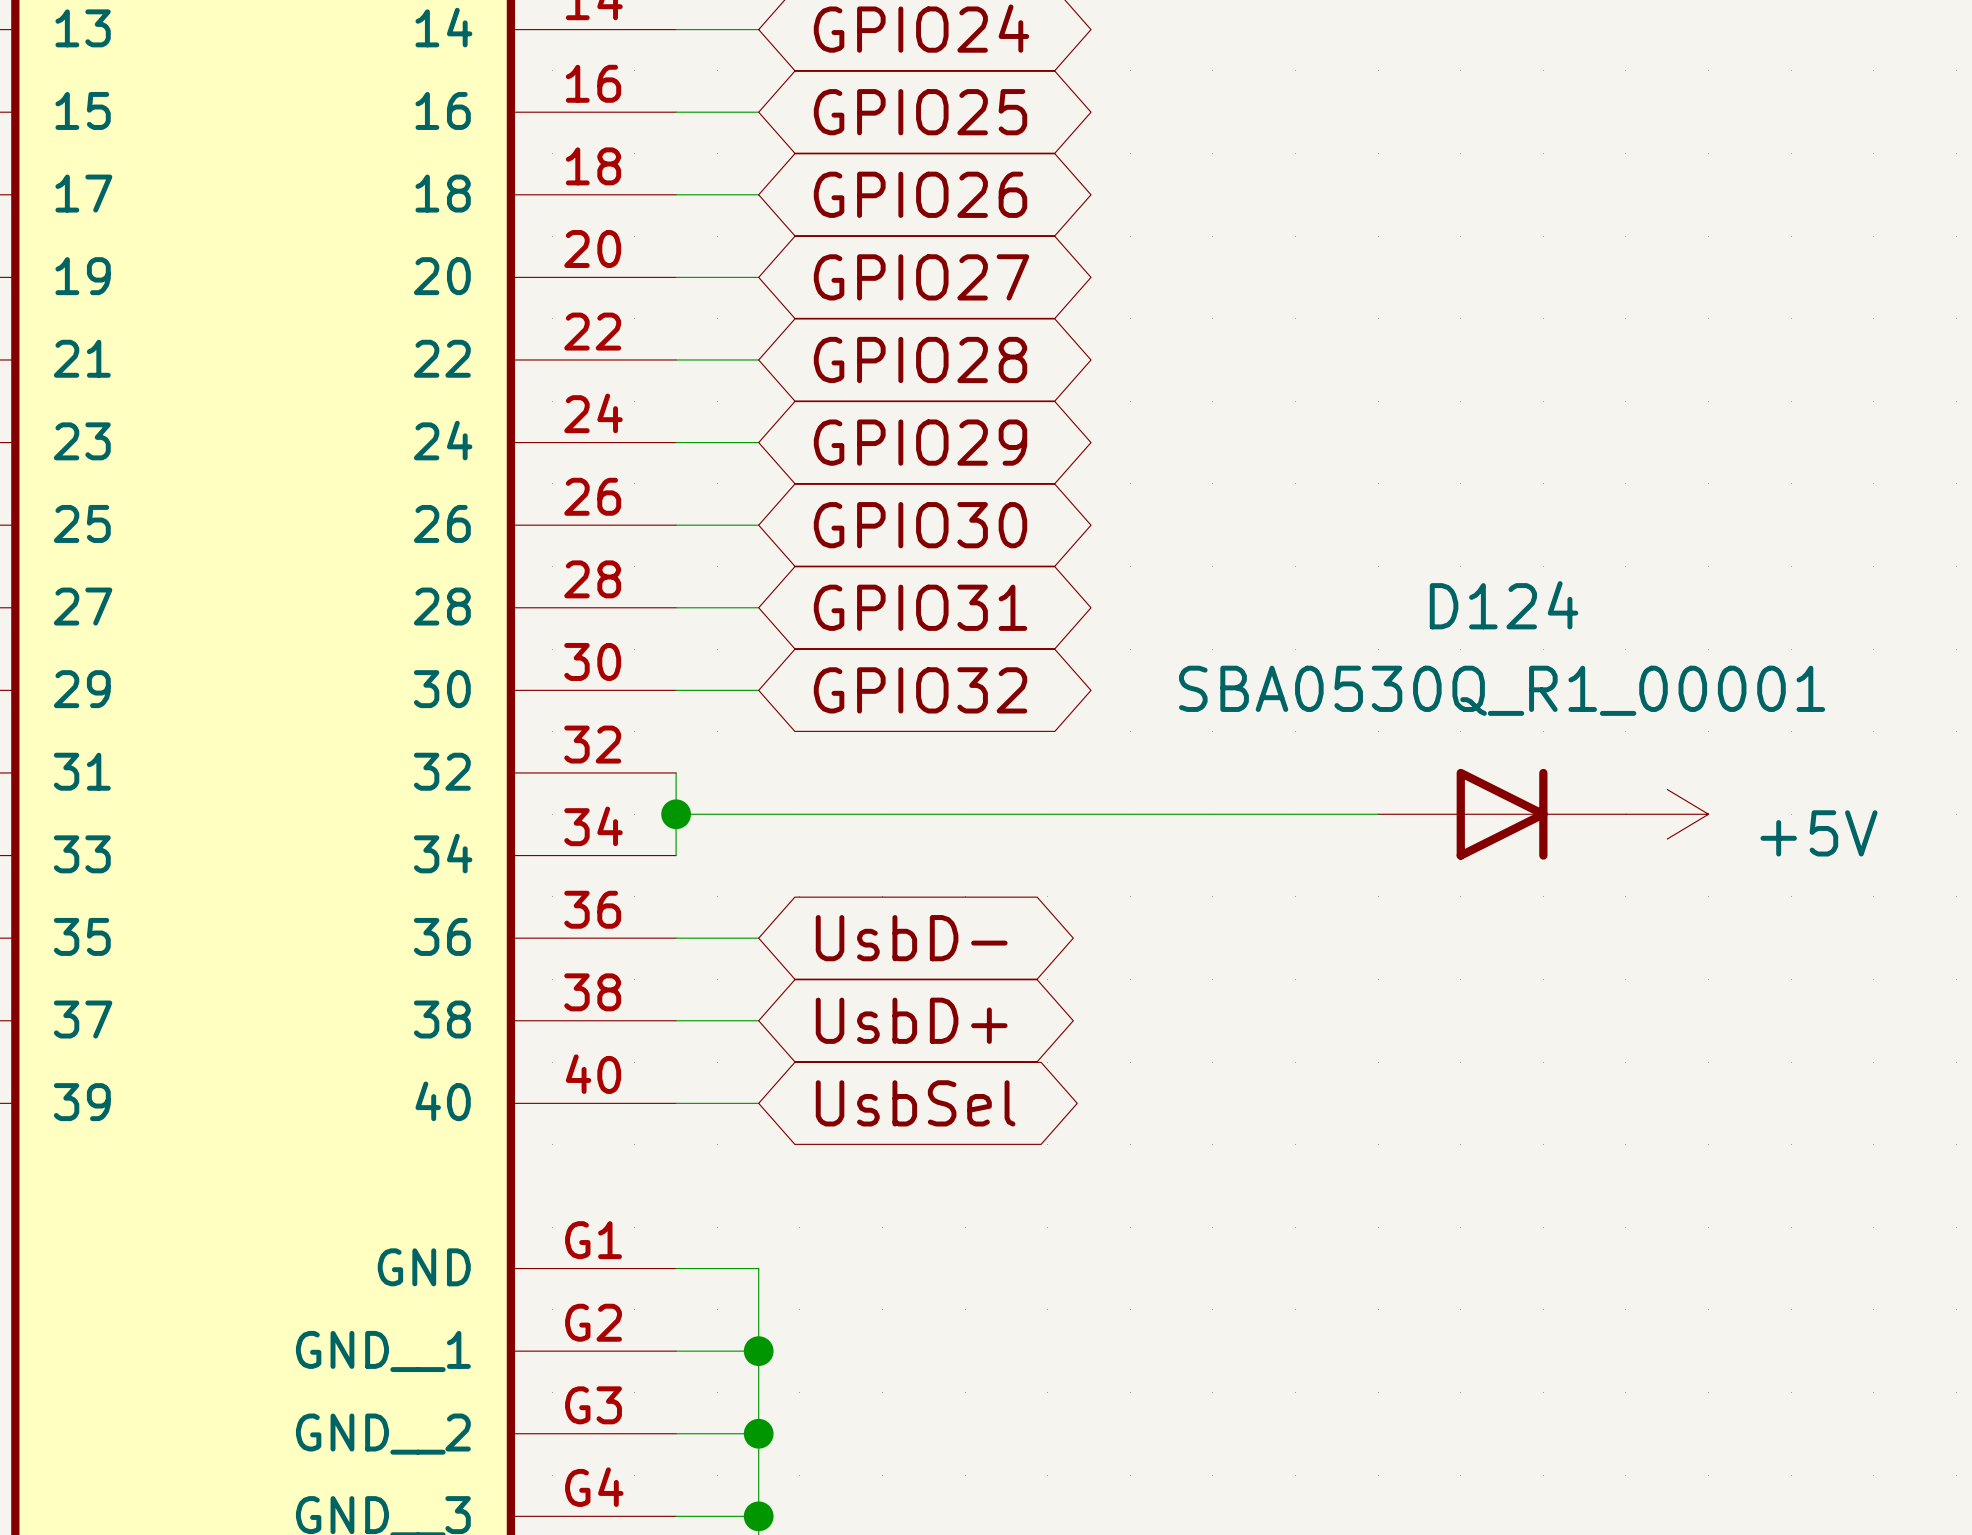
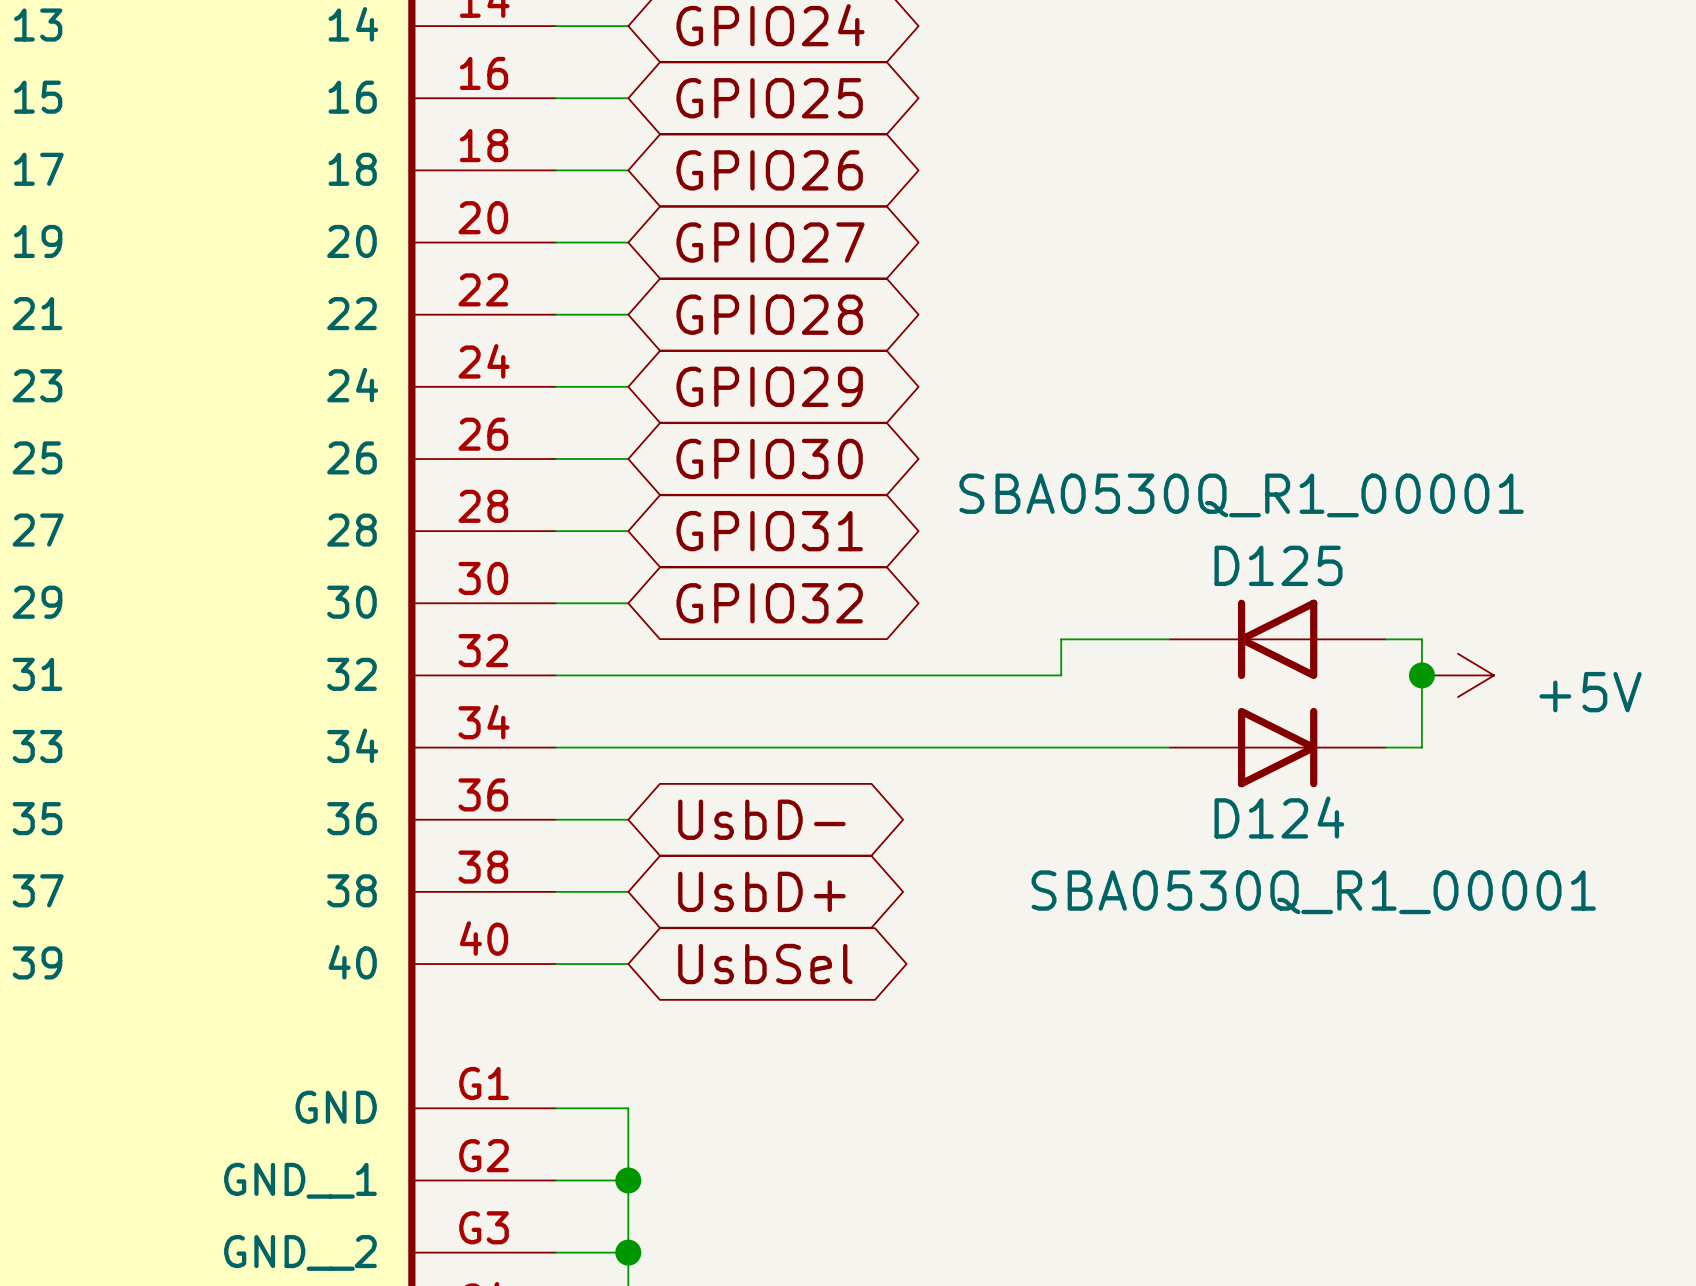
D124 name position: D124 (1504, 605) -> D124 (1279, 817)
D124 value position: SBA0530Q_R1_00001 (1502, 690) -> SBA0530Q_R1_00001 (1313, 892)
wire: none -> (1169, 639) (1061, 639) (1061, 675) (556, 675)
D125: none -> SBA0530Q_R1_00001 (1277, 639)
wire: none -> (1385, 639) (1421, 639) (1421, 747) (1385, 747)
wire: (676, 772) (676, 855) -> (1169, 747) (556, 747)
junction: none -> (1421, 675)
wire: (676, 814) (1378, 814) -> none
junction: (676, 814) -> none
D124 position: (1502, 814) -> (1277, 747)
power symbol position: +5V (1667, 814) -> +5V (1458, 675)

